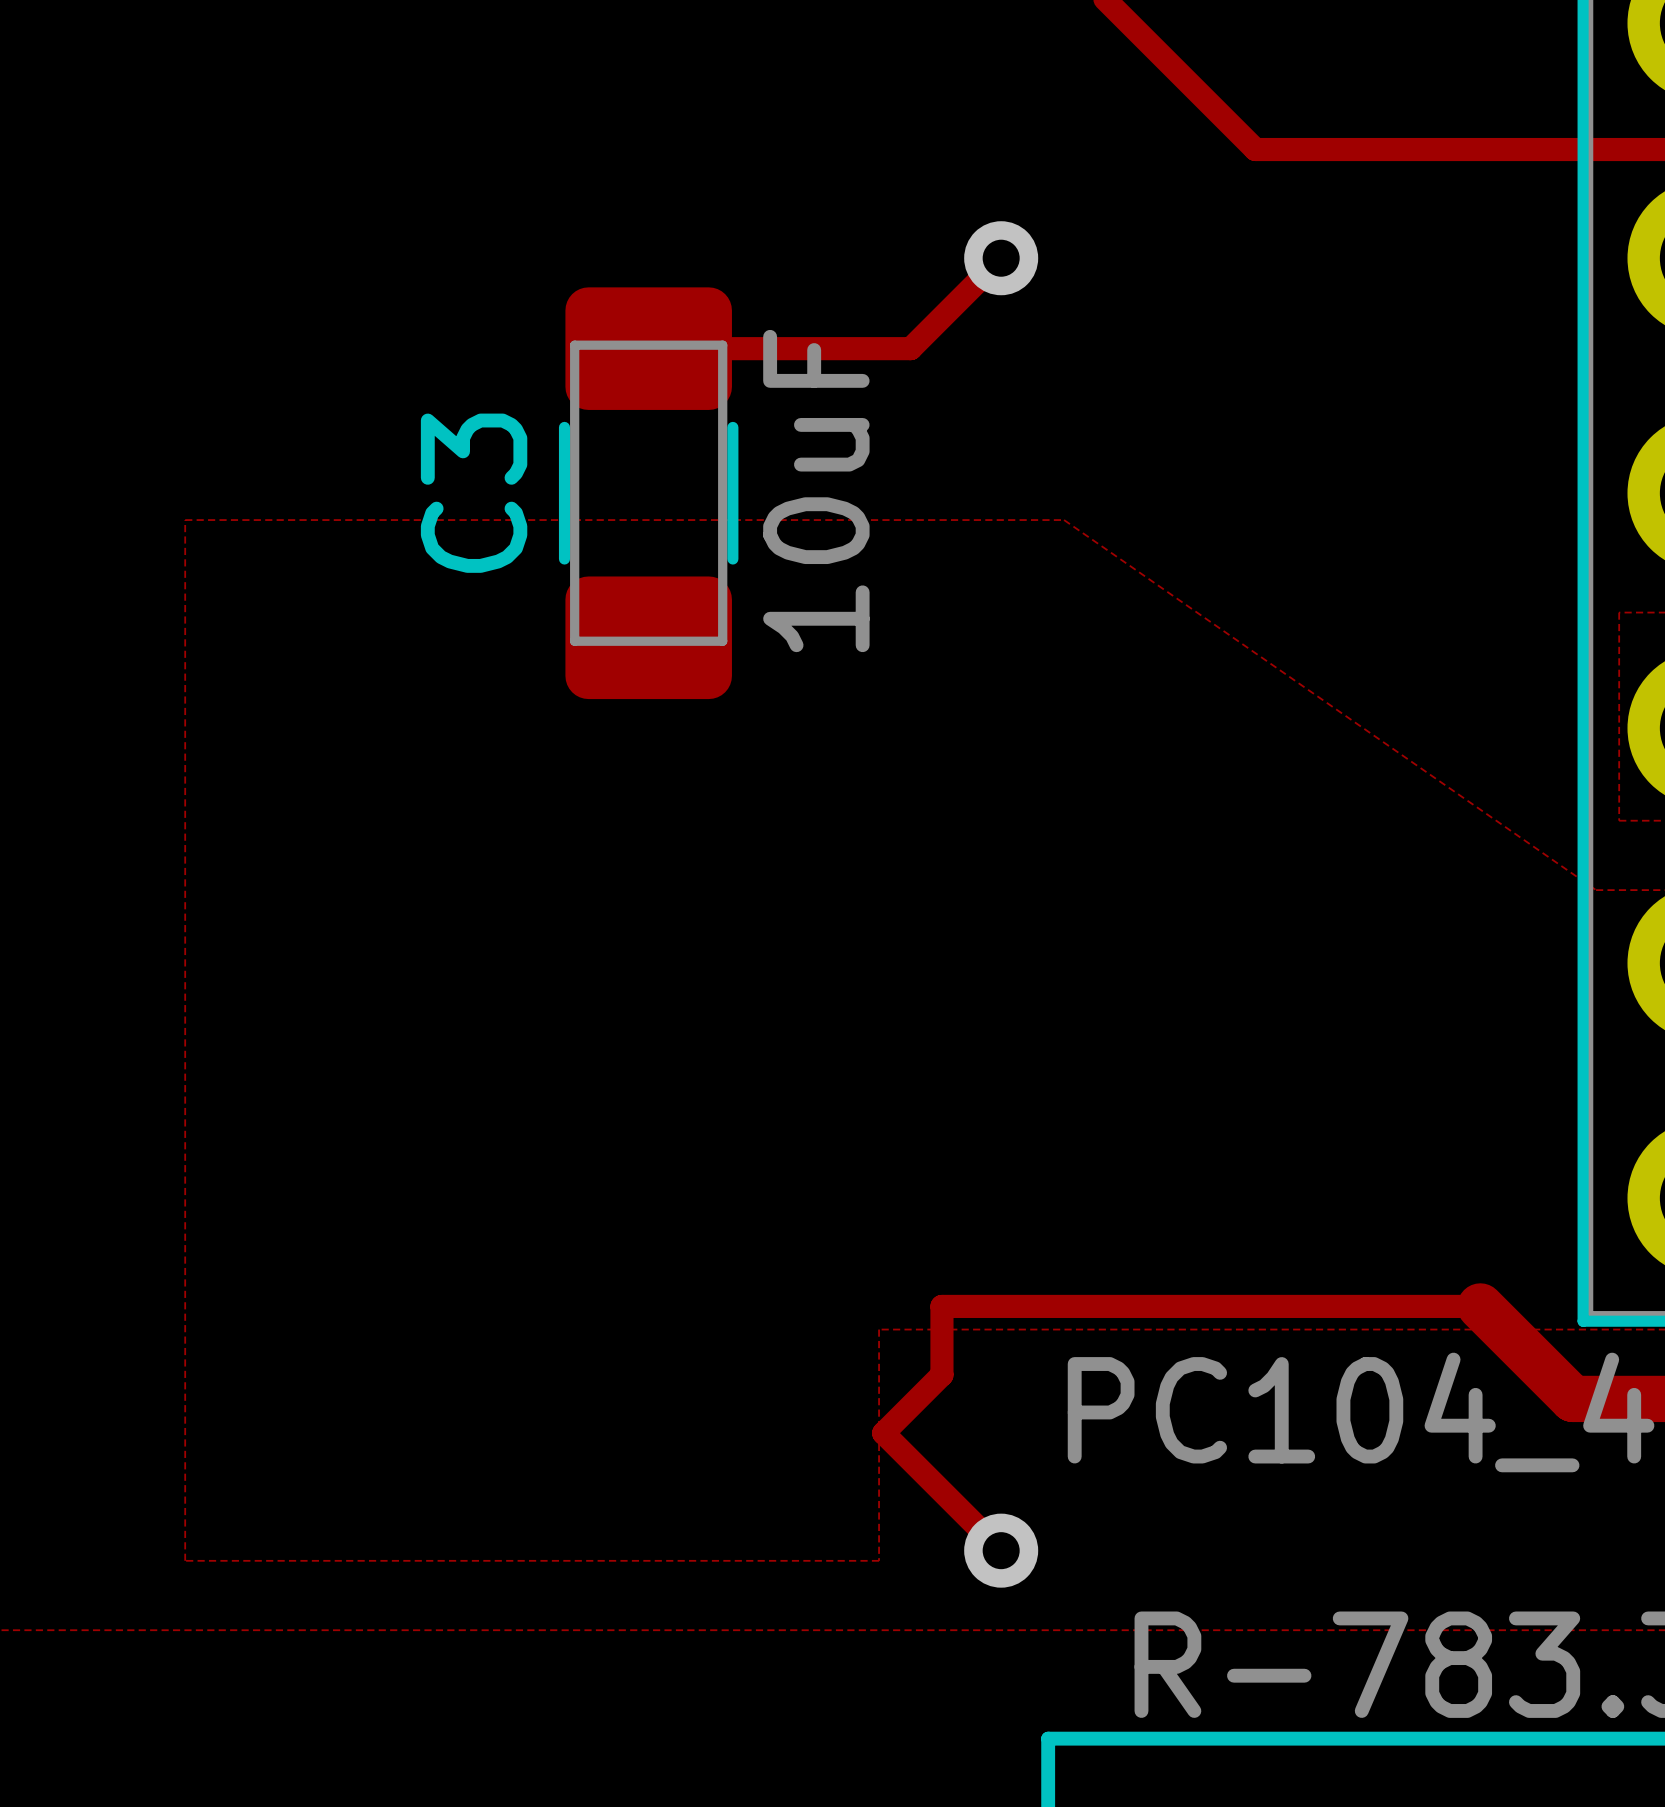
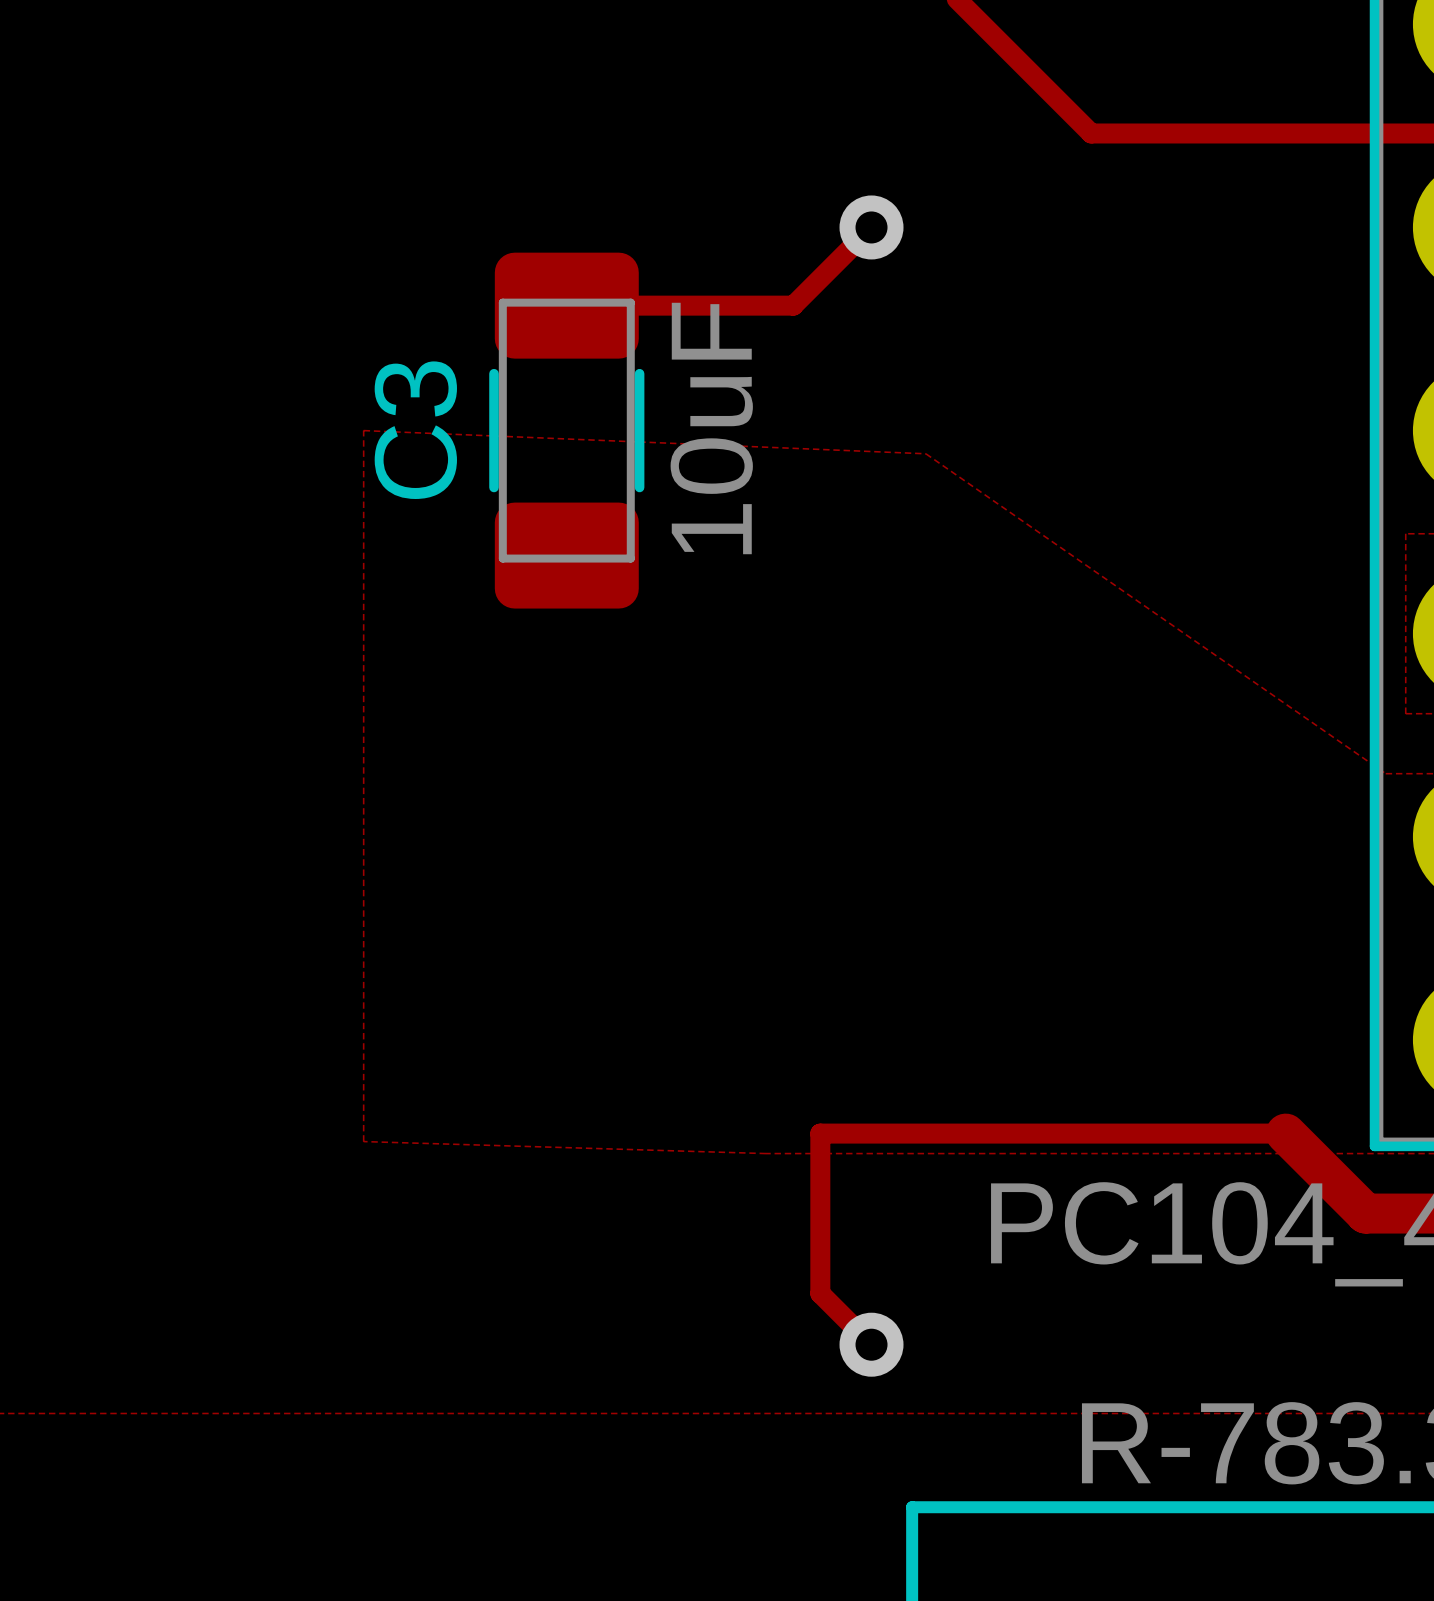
zone outline: (1064, 520) (185, 520) (185, 1560) (879, 1560) (879, 1329) -> (925, 453) (363, 430) (363, 1141) (765, 1153)
track: (941, 1374) (883, 1433) (941, 1491) -> (820, 1192) (820, 1293)

